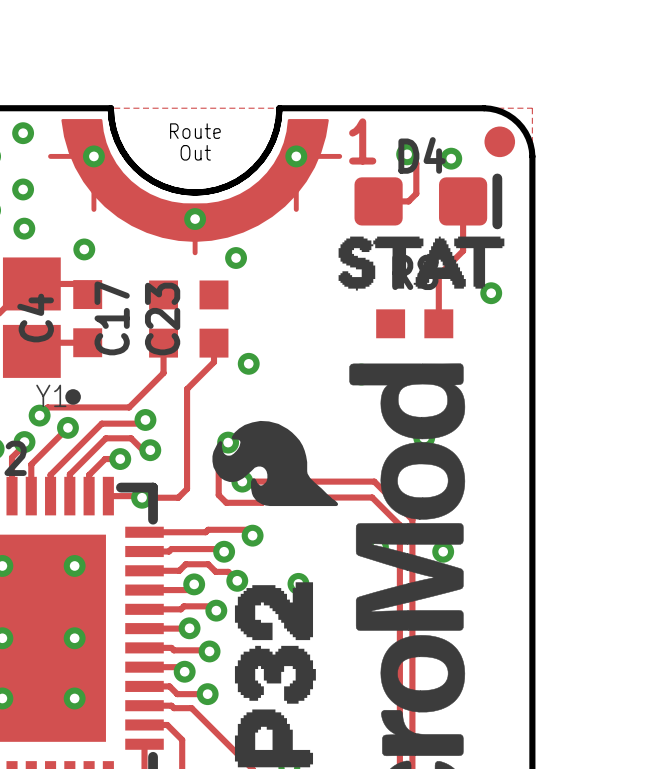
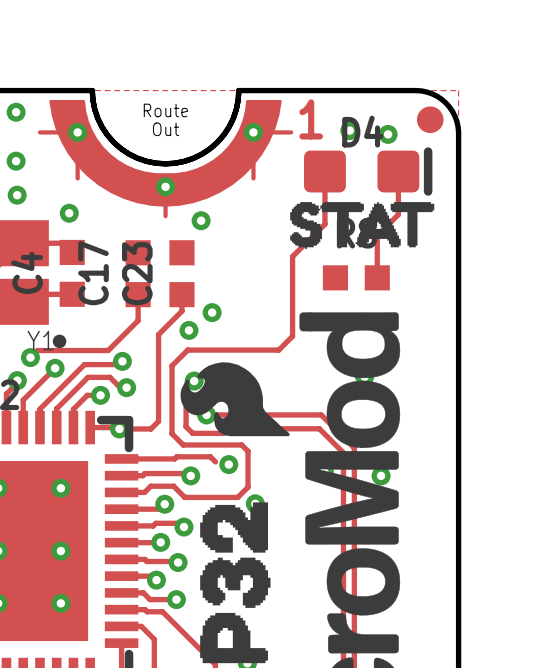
track: (407, 154) (416, 163) (416, 193) (408, 201) (378, 201) -> none
via: (491, 293) -> none
via: none -> (189, 330)
via position: (252, 535) -> (228, 464)
track: (171, 570) (179, 570) (185, 564) (208, 564) (215, 571) (228, 571) (237, 580) -> (144, 492) (150, 486) (173, 486) (184, 497) (237, 497) (248, 487) (248, 451) (241, 445) (183, 445) (172, 433) (172, 365) (187, 350) (278, 350) (292, 336) (292, 256) (324, 224) (324, 171)
via: (237, 580) -> none

